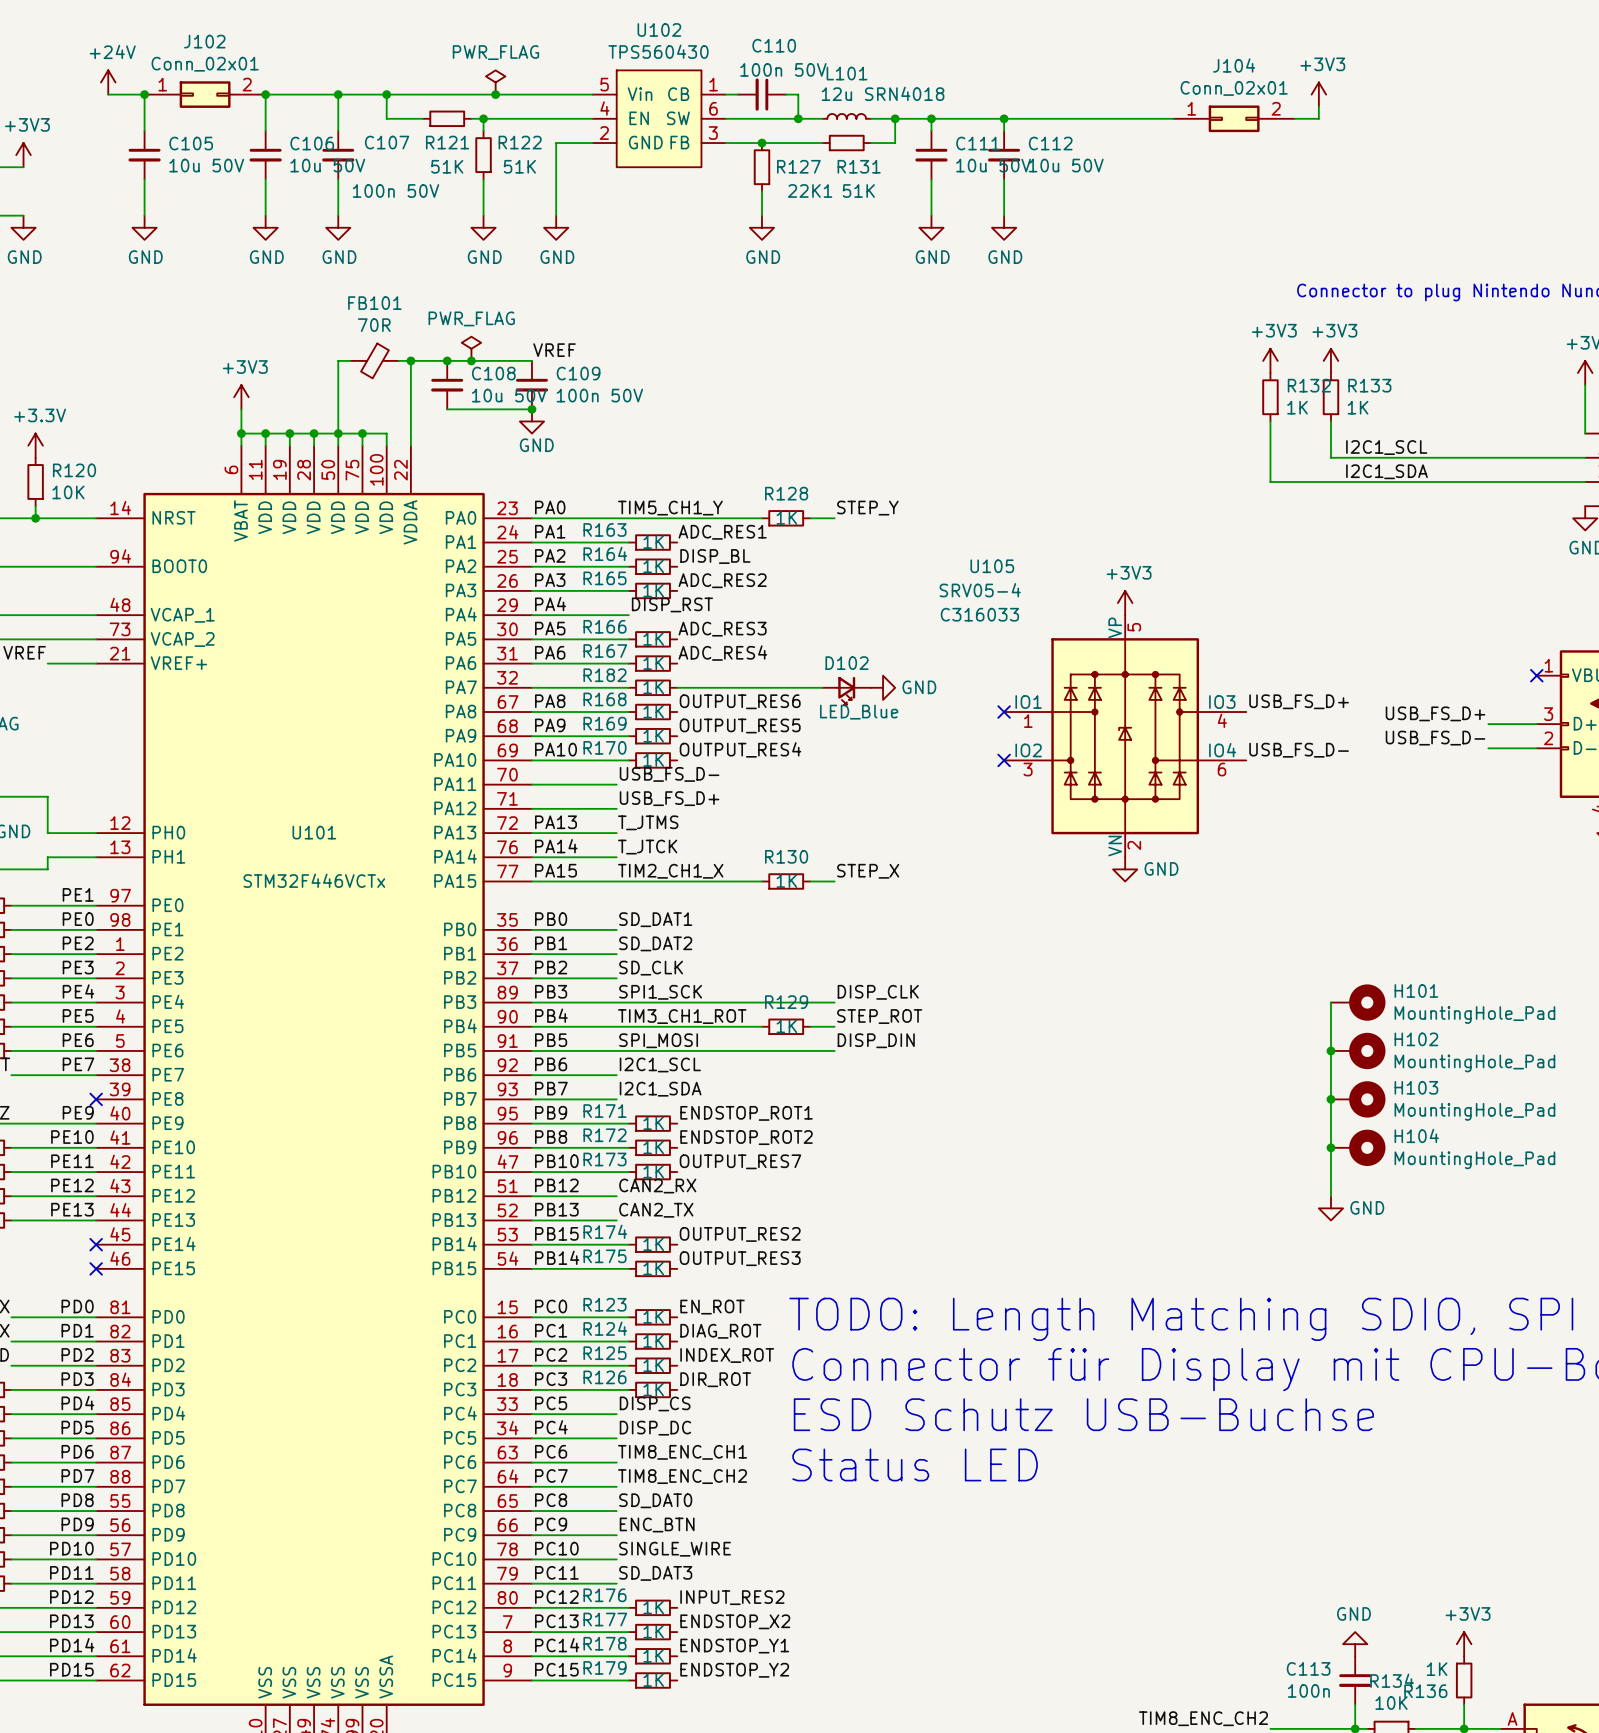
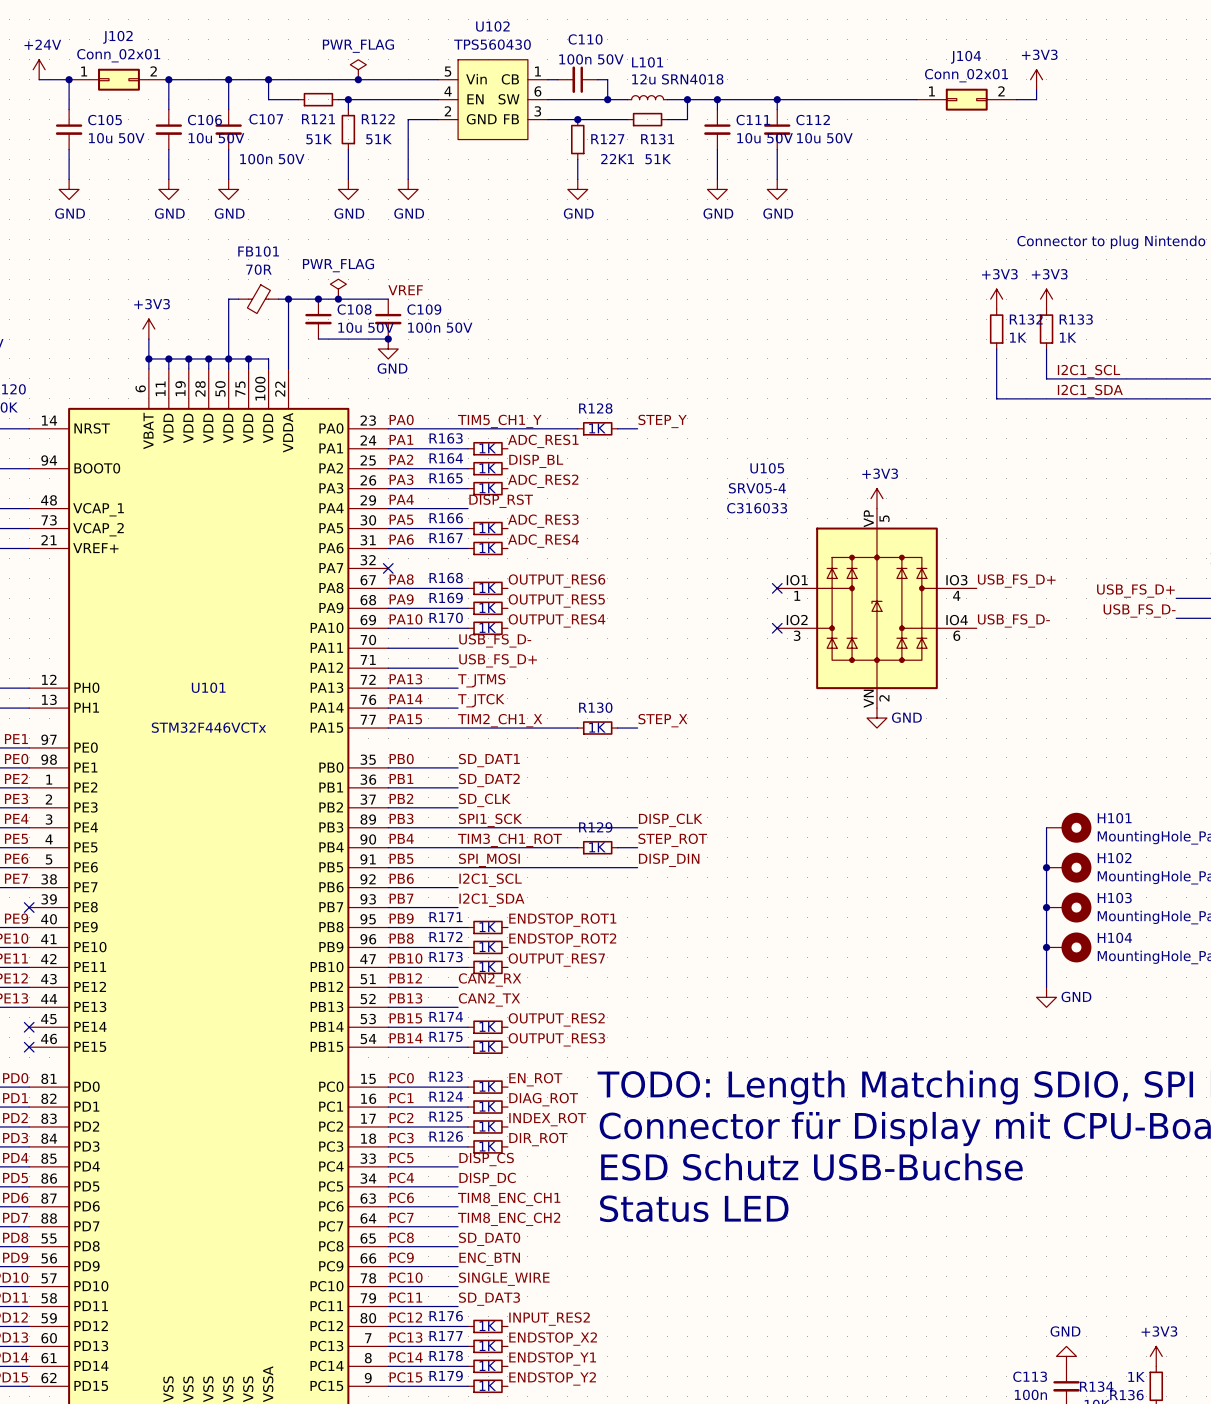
wire: (531, 687) (628, 687) -> none
no-connect mark: none -> (388, 568)
R182: 1K (653, 687) -> none
wire: (677, 687) (822, 687) -> none
power symbol: GND (883, 687) -> none
D102: LED_Blue (846, 690) -> none

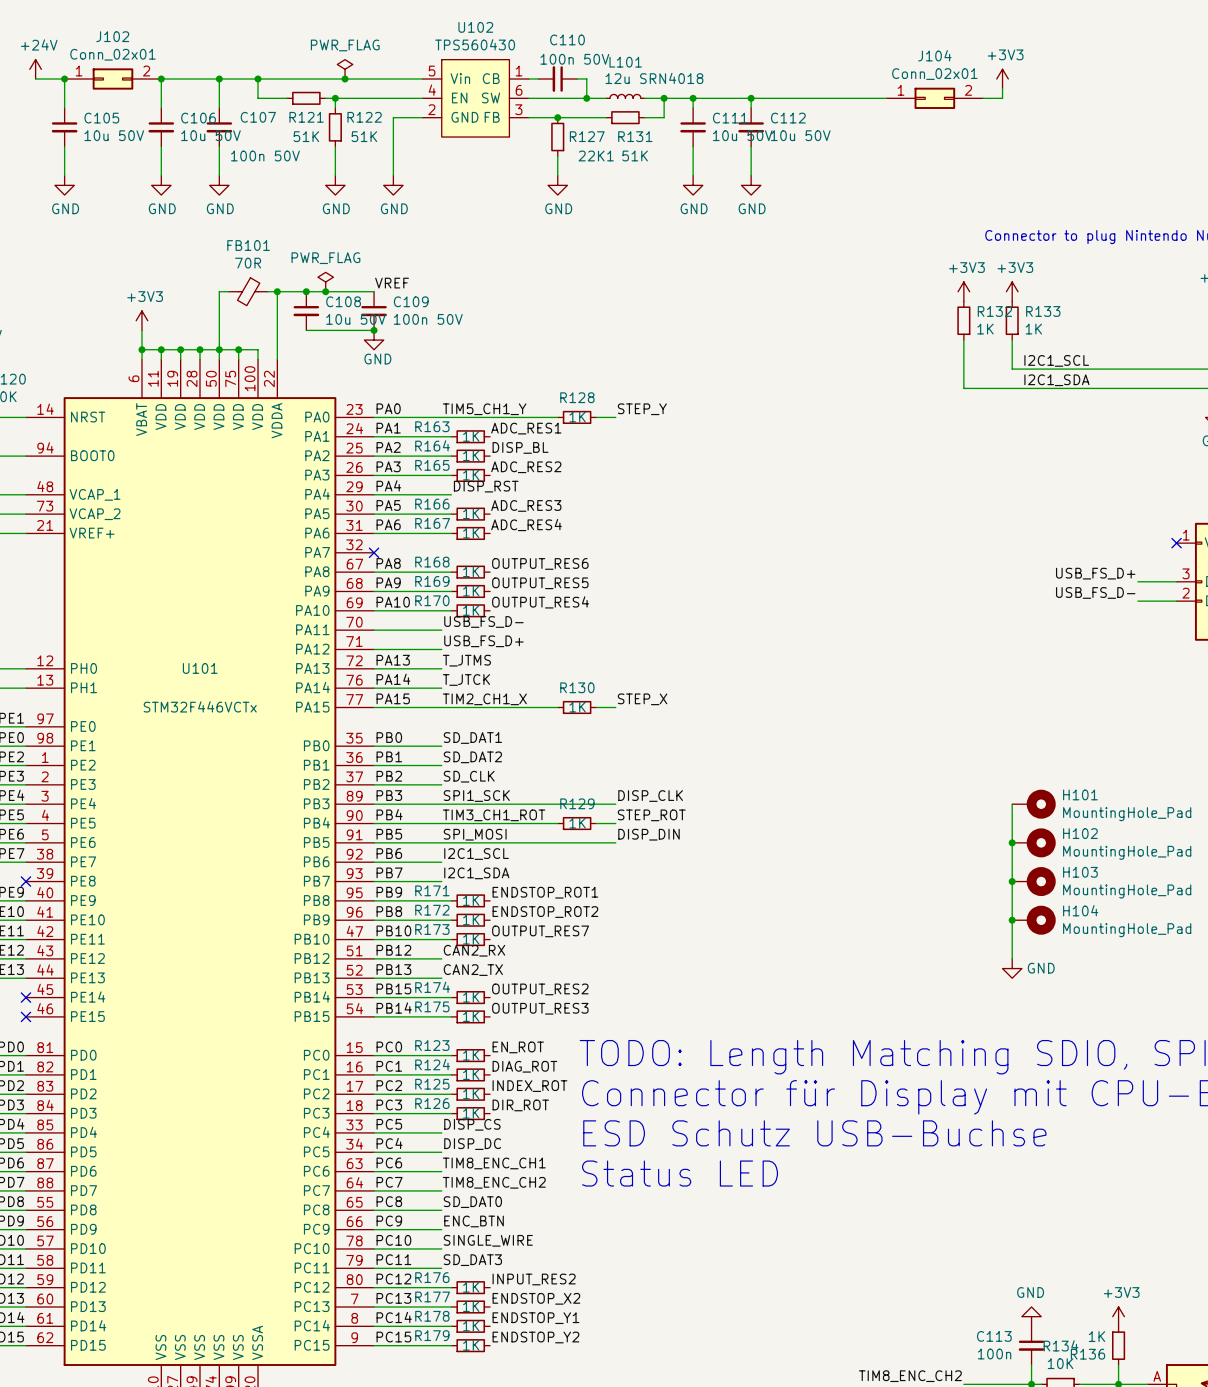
power symbol: +3V3 (876, 498) -> none
label: USB_FS_D+ (1016, 581) -> none
no-connect mark: (777, 588) -> none
U105: SRV05-4 (876, 608) -> none
label: USB_FS_D- (1013, 620) -> none
no-connect mark: (777, 628) -> none
power symbol: GND (876, 718) -> none

